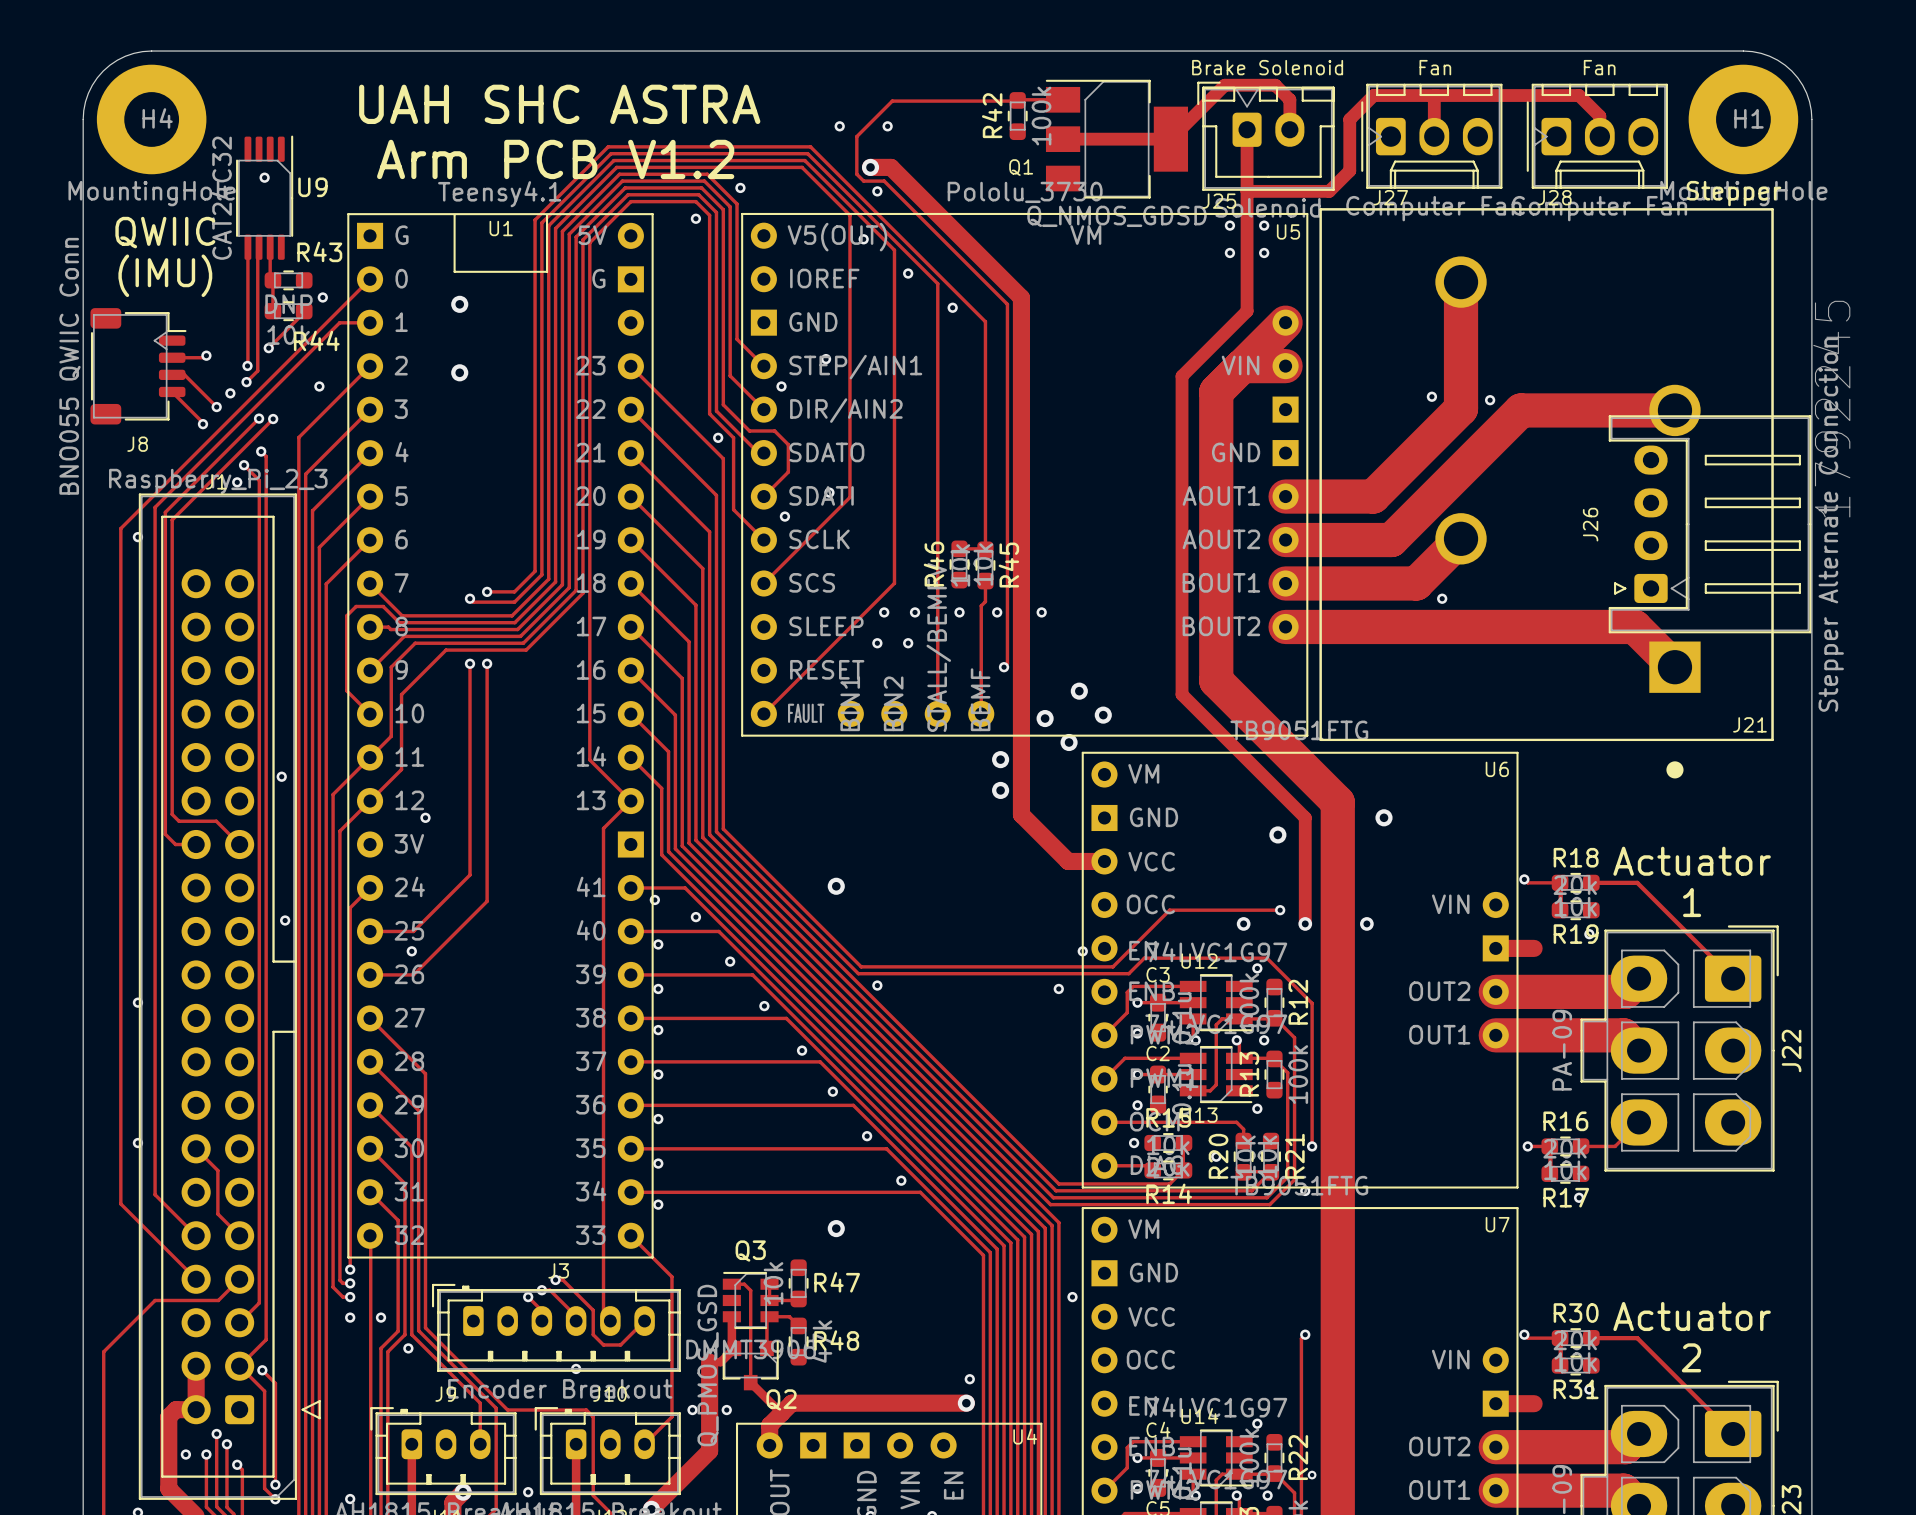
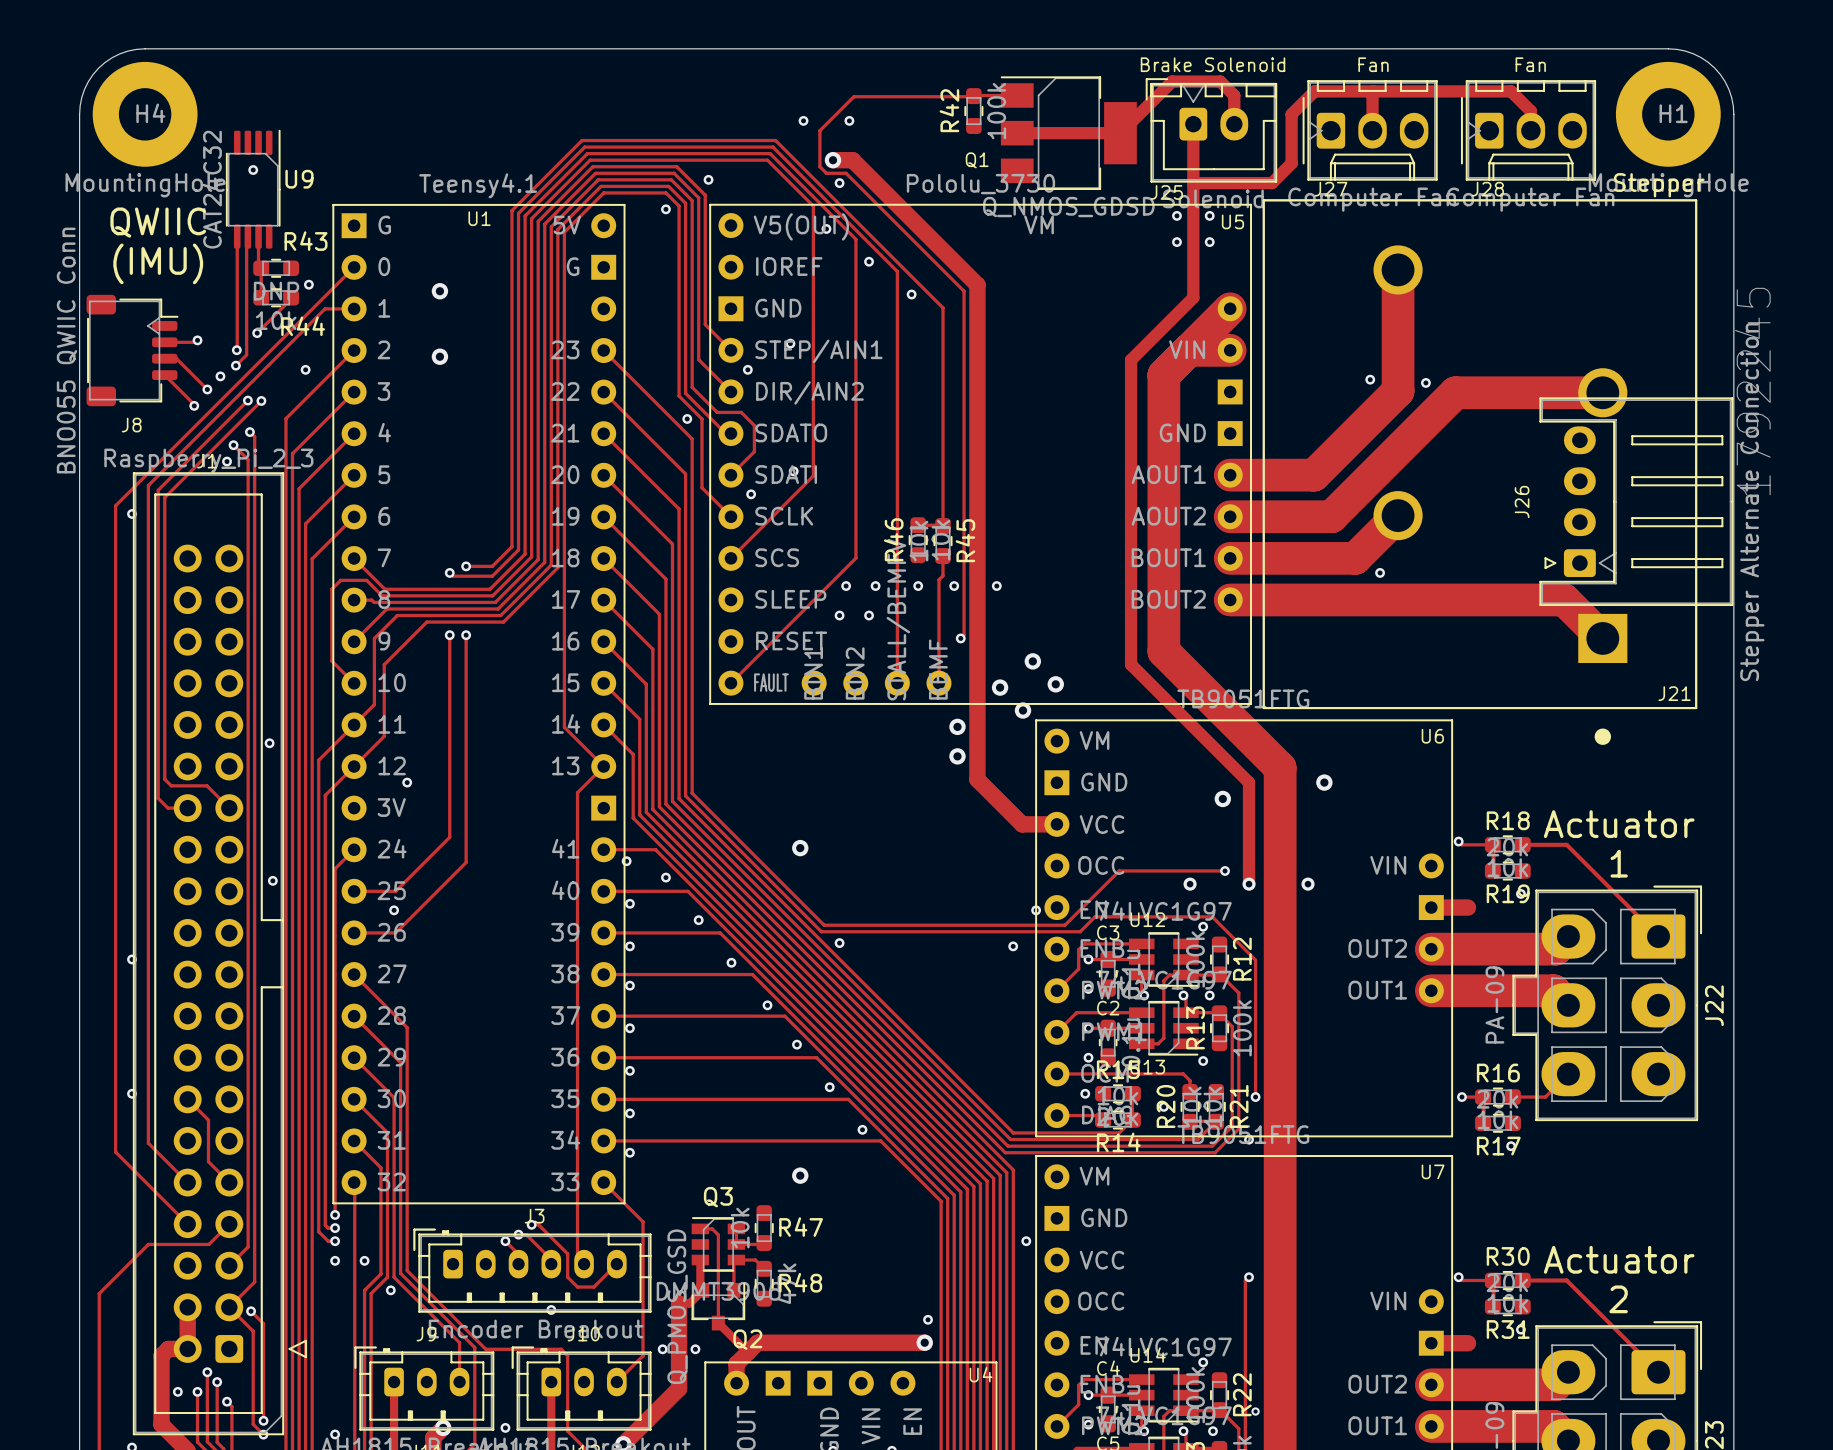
text: UAH SHC ASTRA (559, 104) -> none
text: Arm PCB V1.2 (555, 159) -> none
line: (454, 215) (454, 271) (547, 271) (547, 215) -> none

